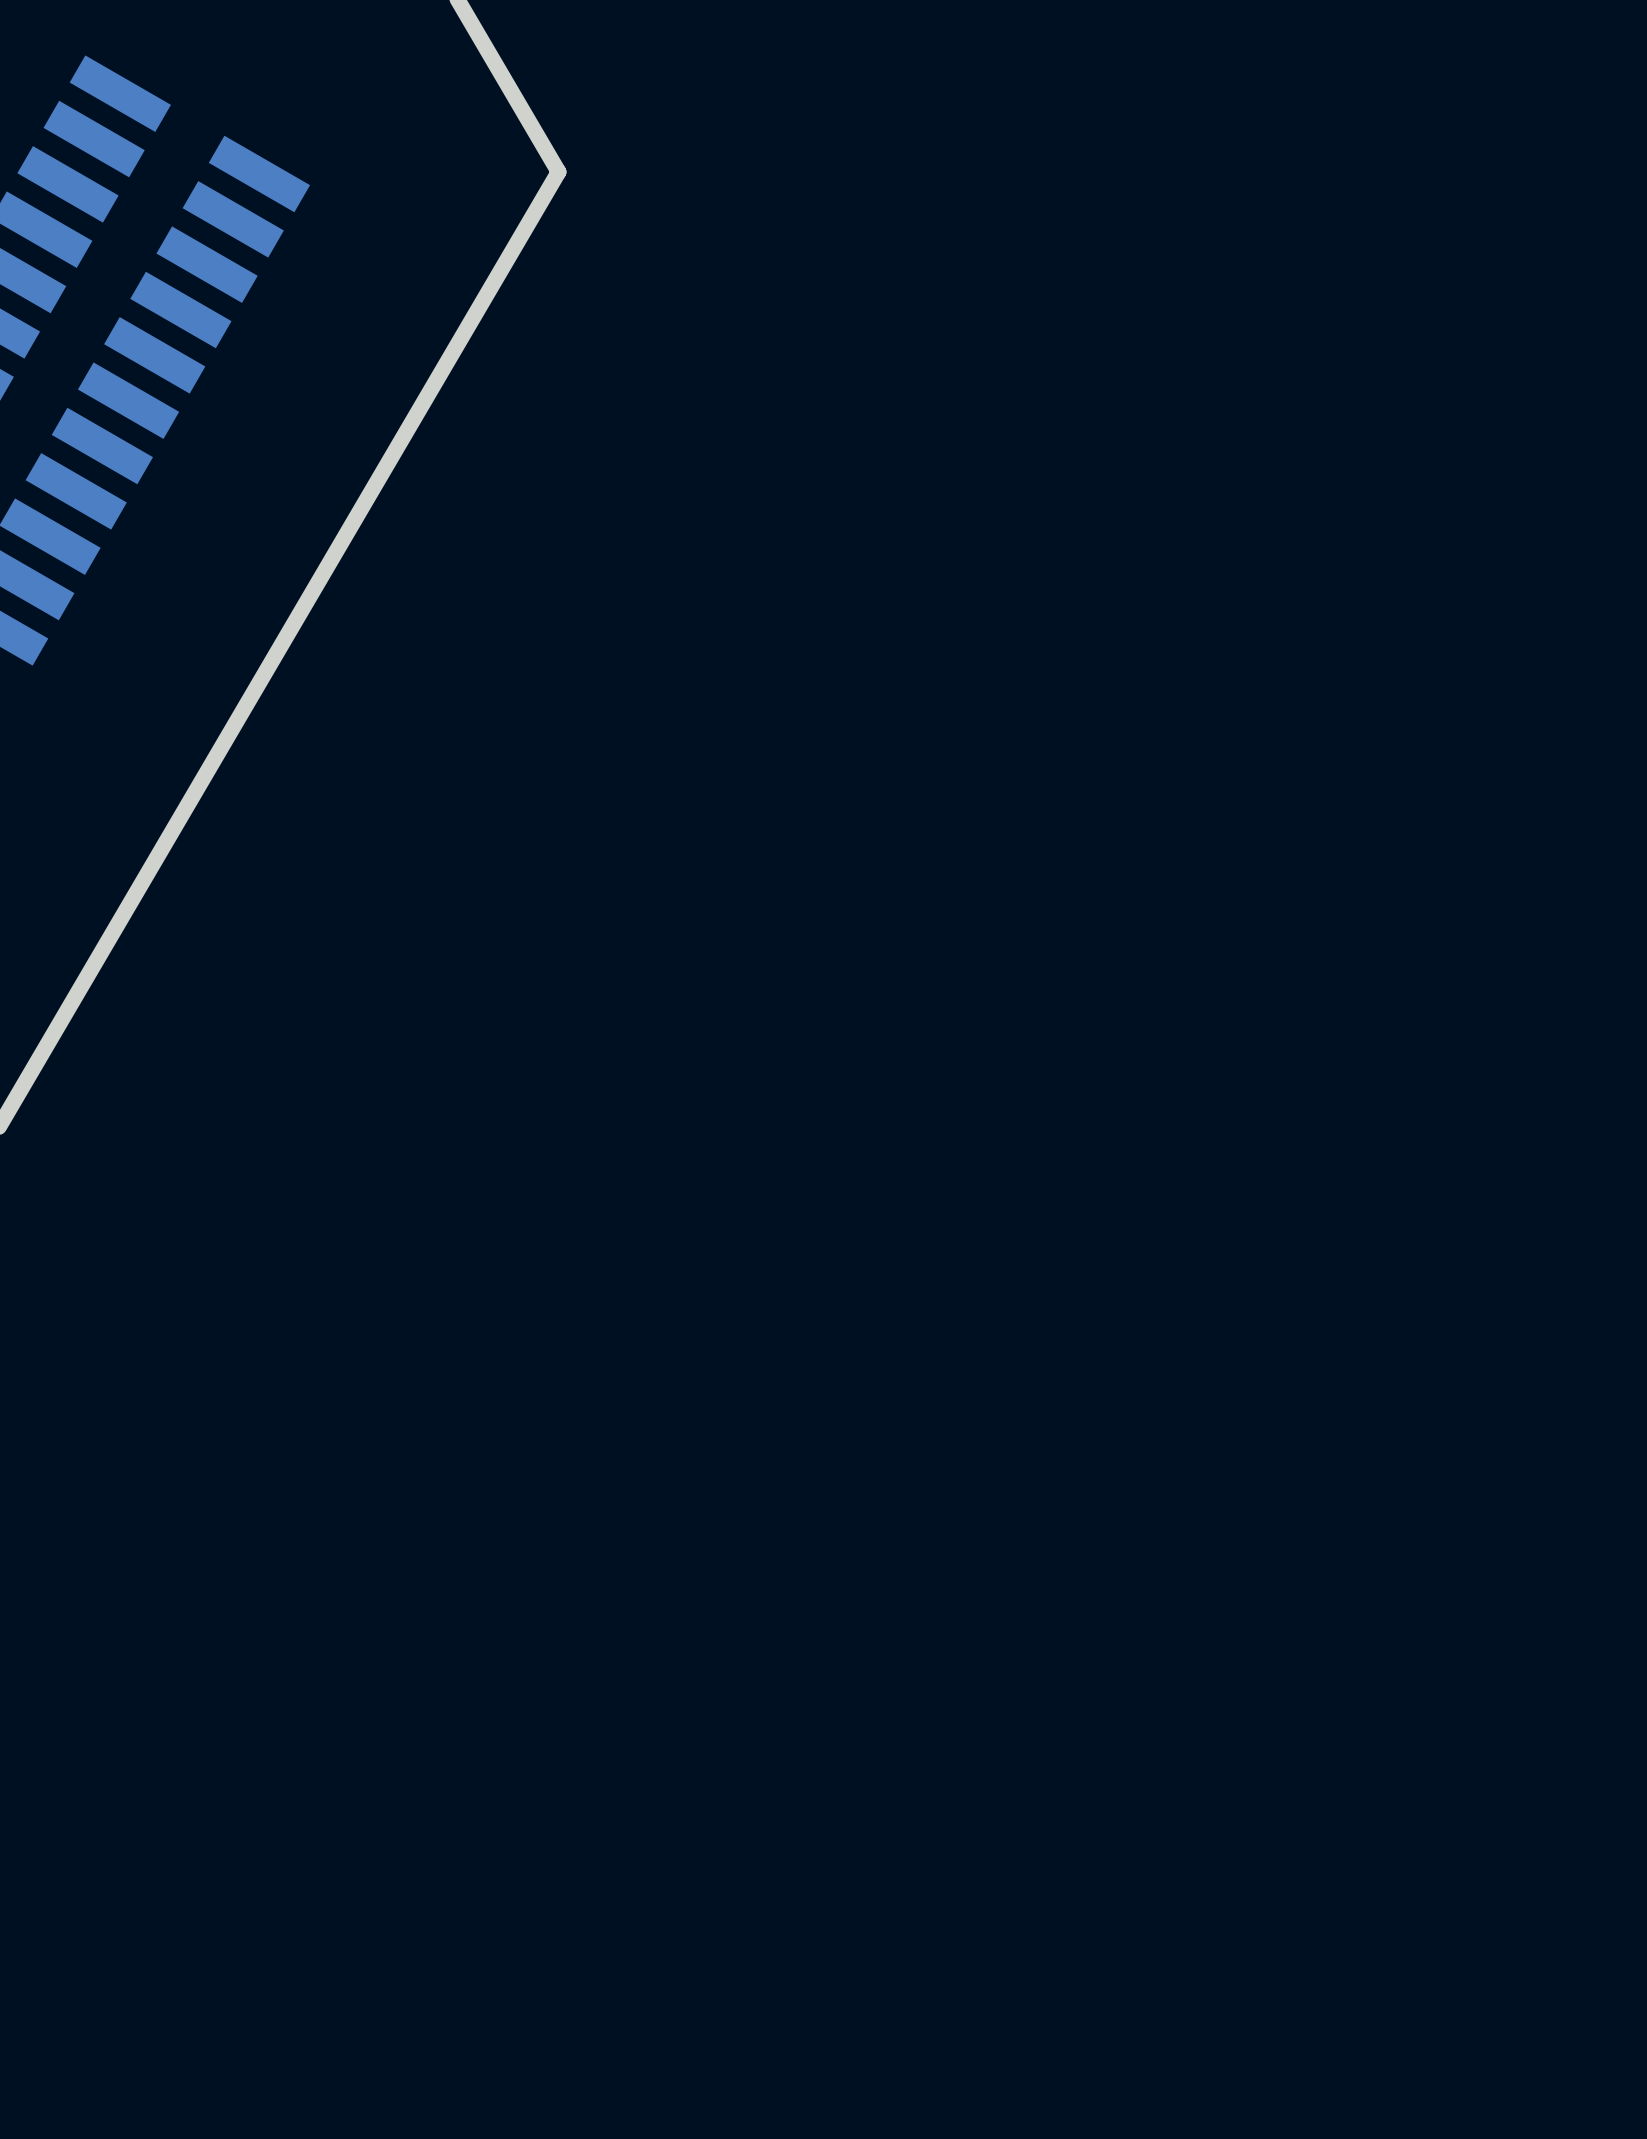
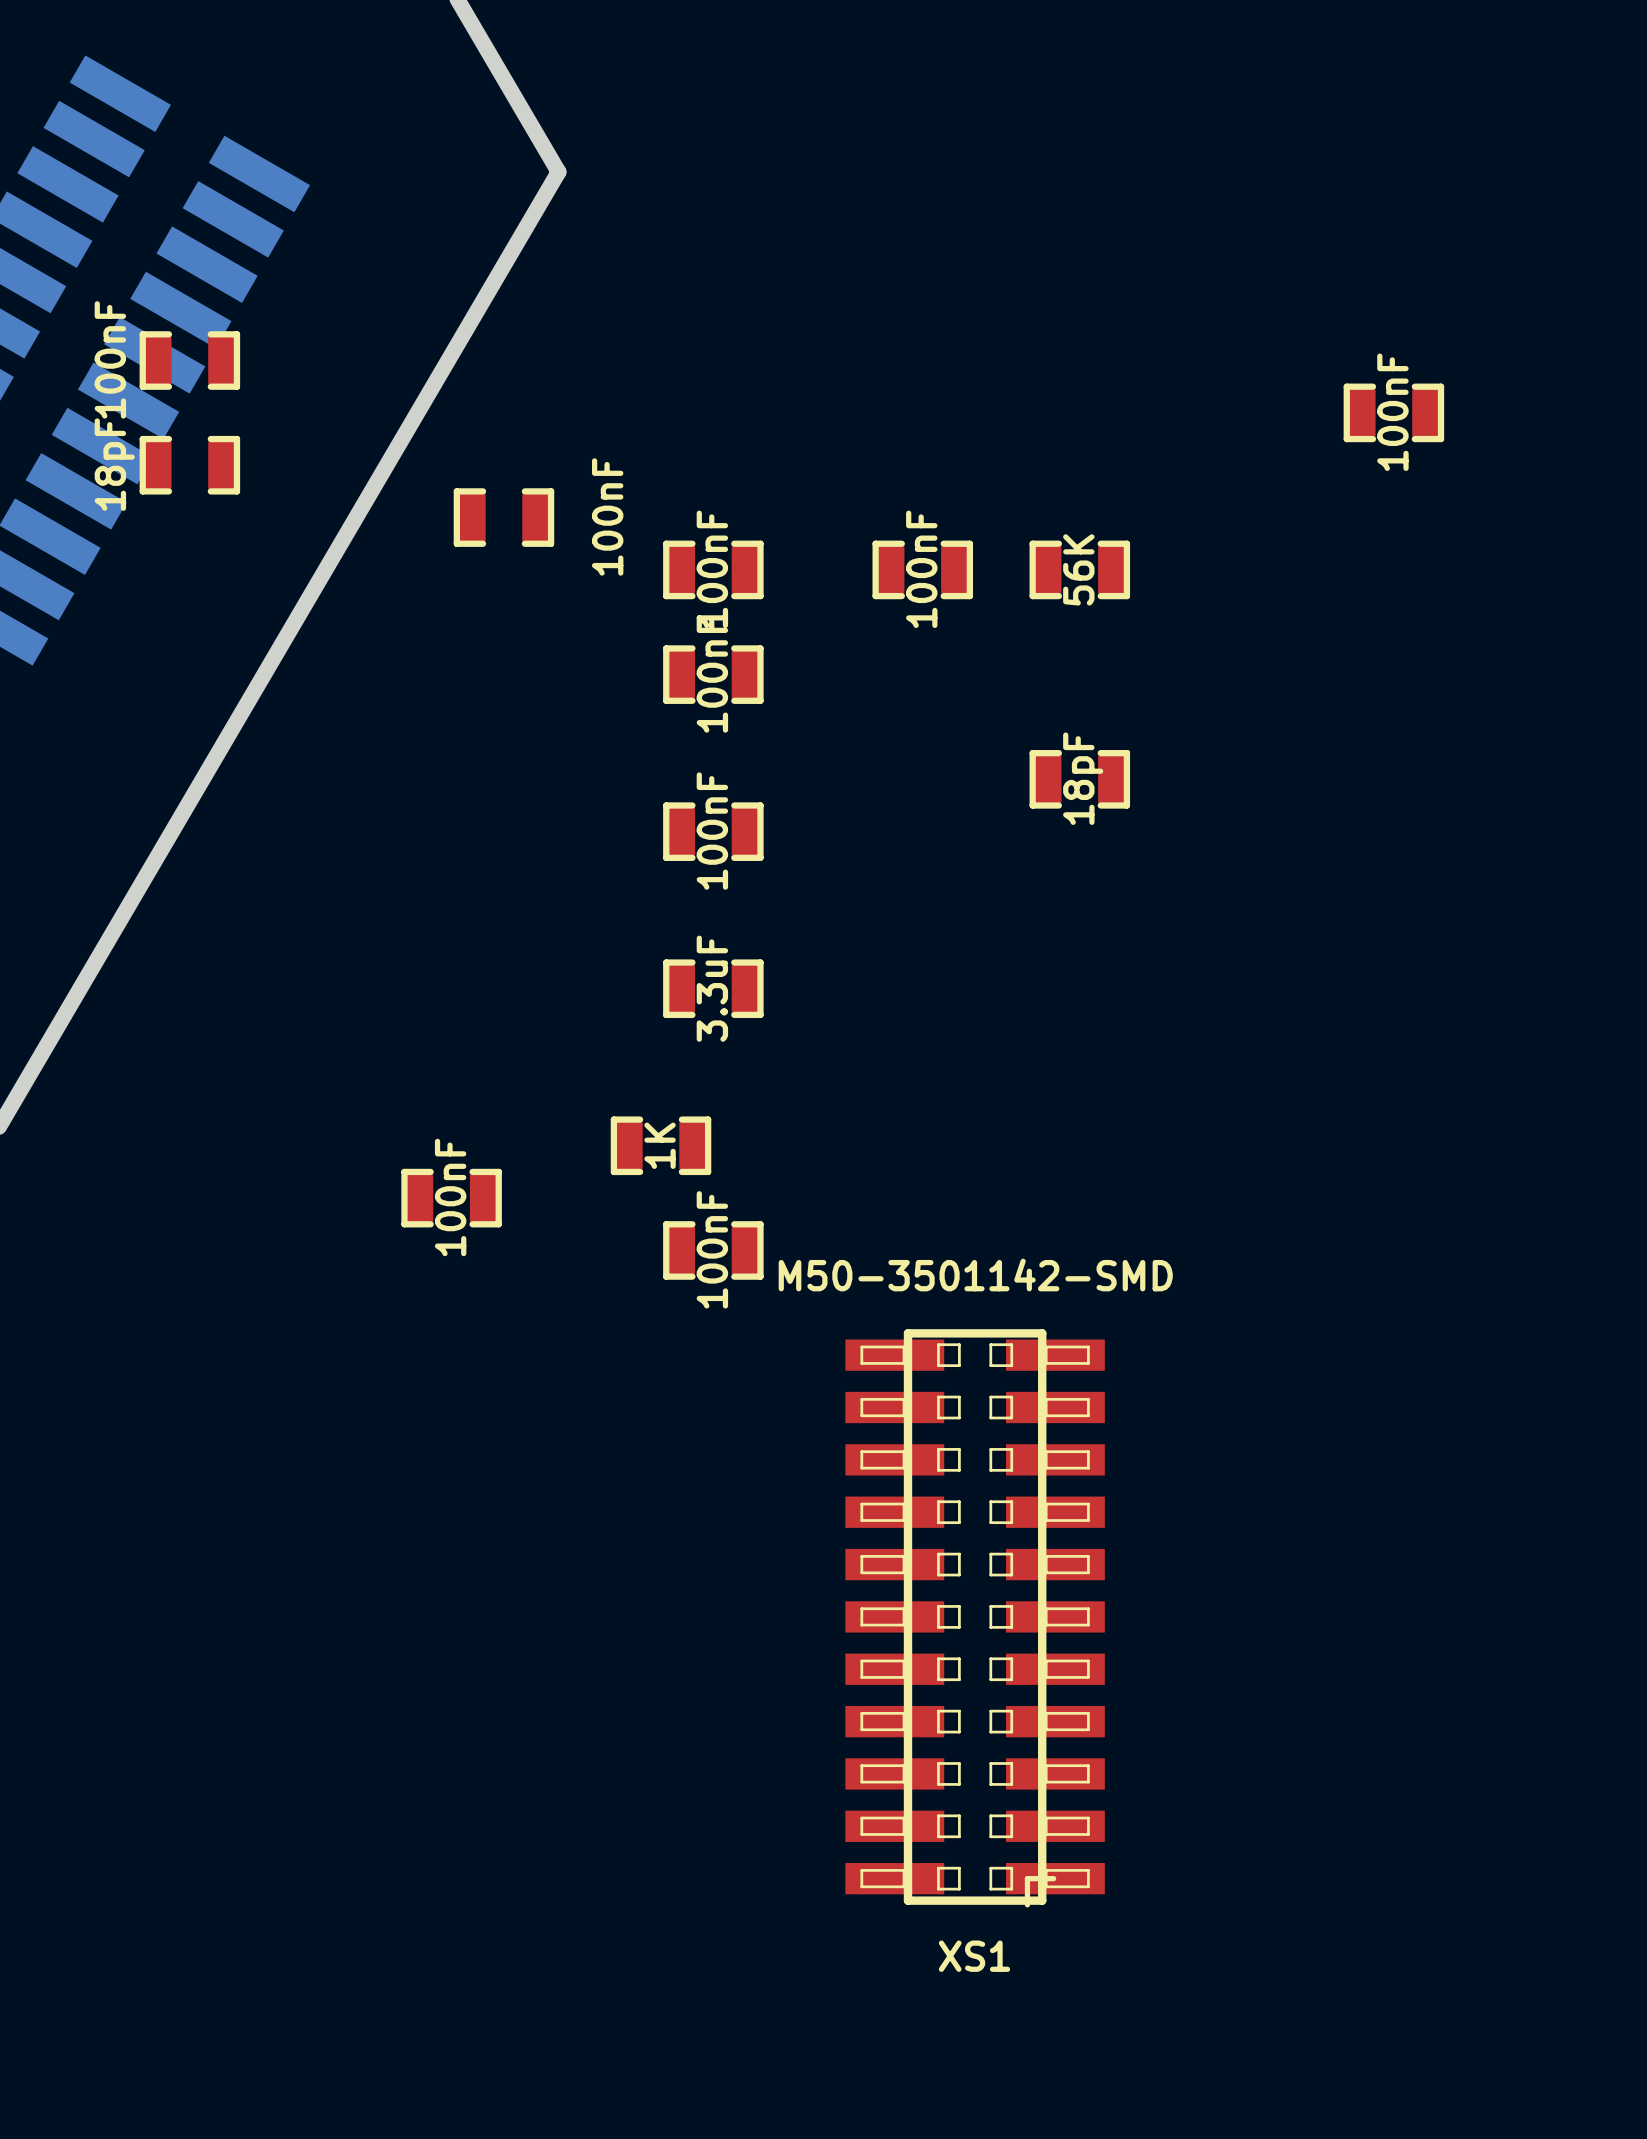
part: none -> 100nF (189, 360)
part: none -> 100nF (1393, 412)
part: none -> 18pF (189, 465)
part: none -> 100nF (503, 517)
part: none -> 100nF (713, 569)
part: none -> 100nF (922, 569)
part: none -> 56K (1079, 569)
part: none -> 100nF (713, 674)
part: none -> 18pF (1079, 779)
part: none -> 100nF (713, 831)
part: none -> 3.3uF (713, 988)
part: none -> 1K (661, 1145)
part: none -> 100nF (451, 1198)
part: none -> 100nF (713, 1250)
XS1: none -> M50-3501142-SMD (975, 1618)

